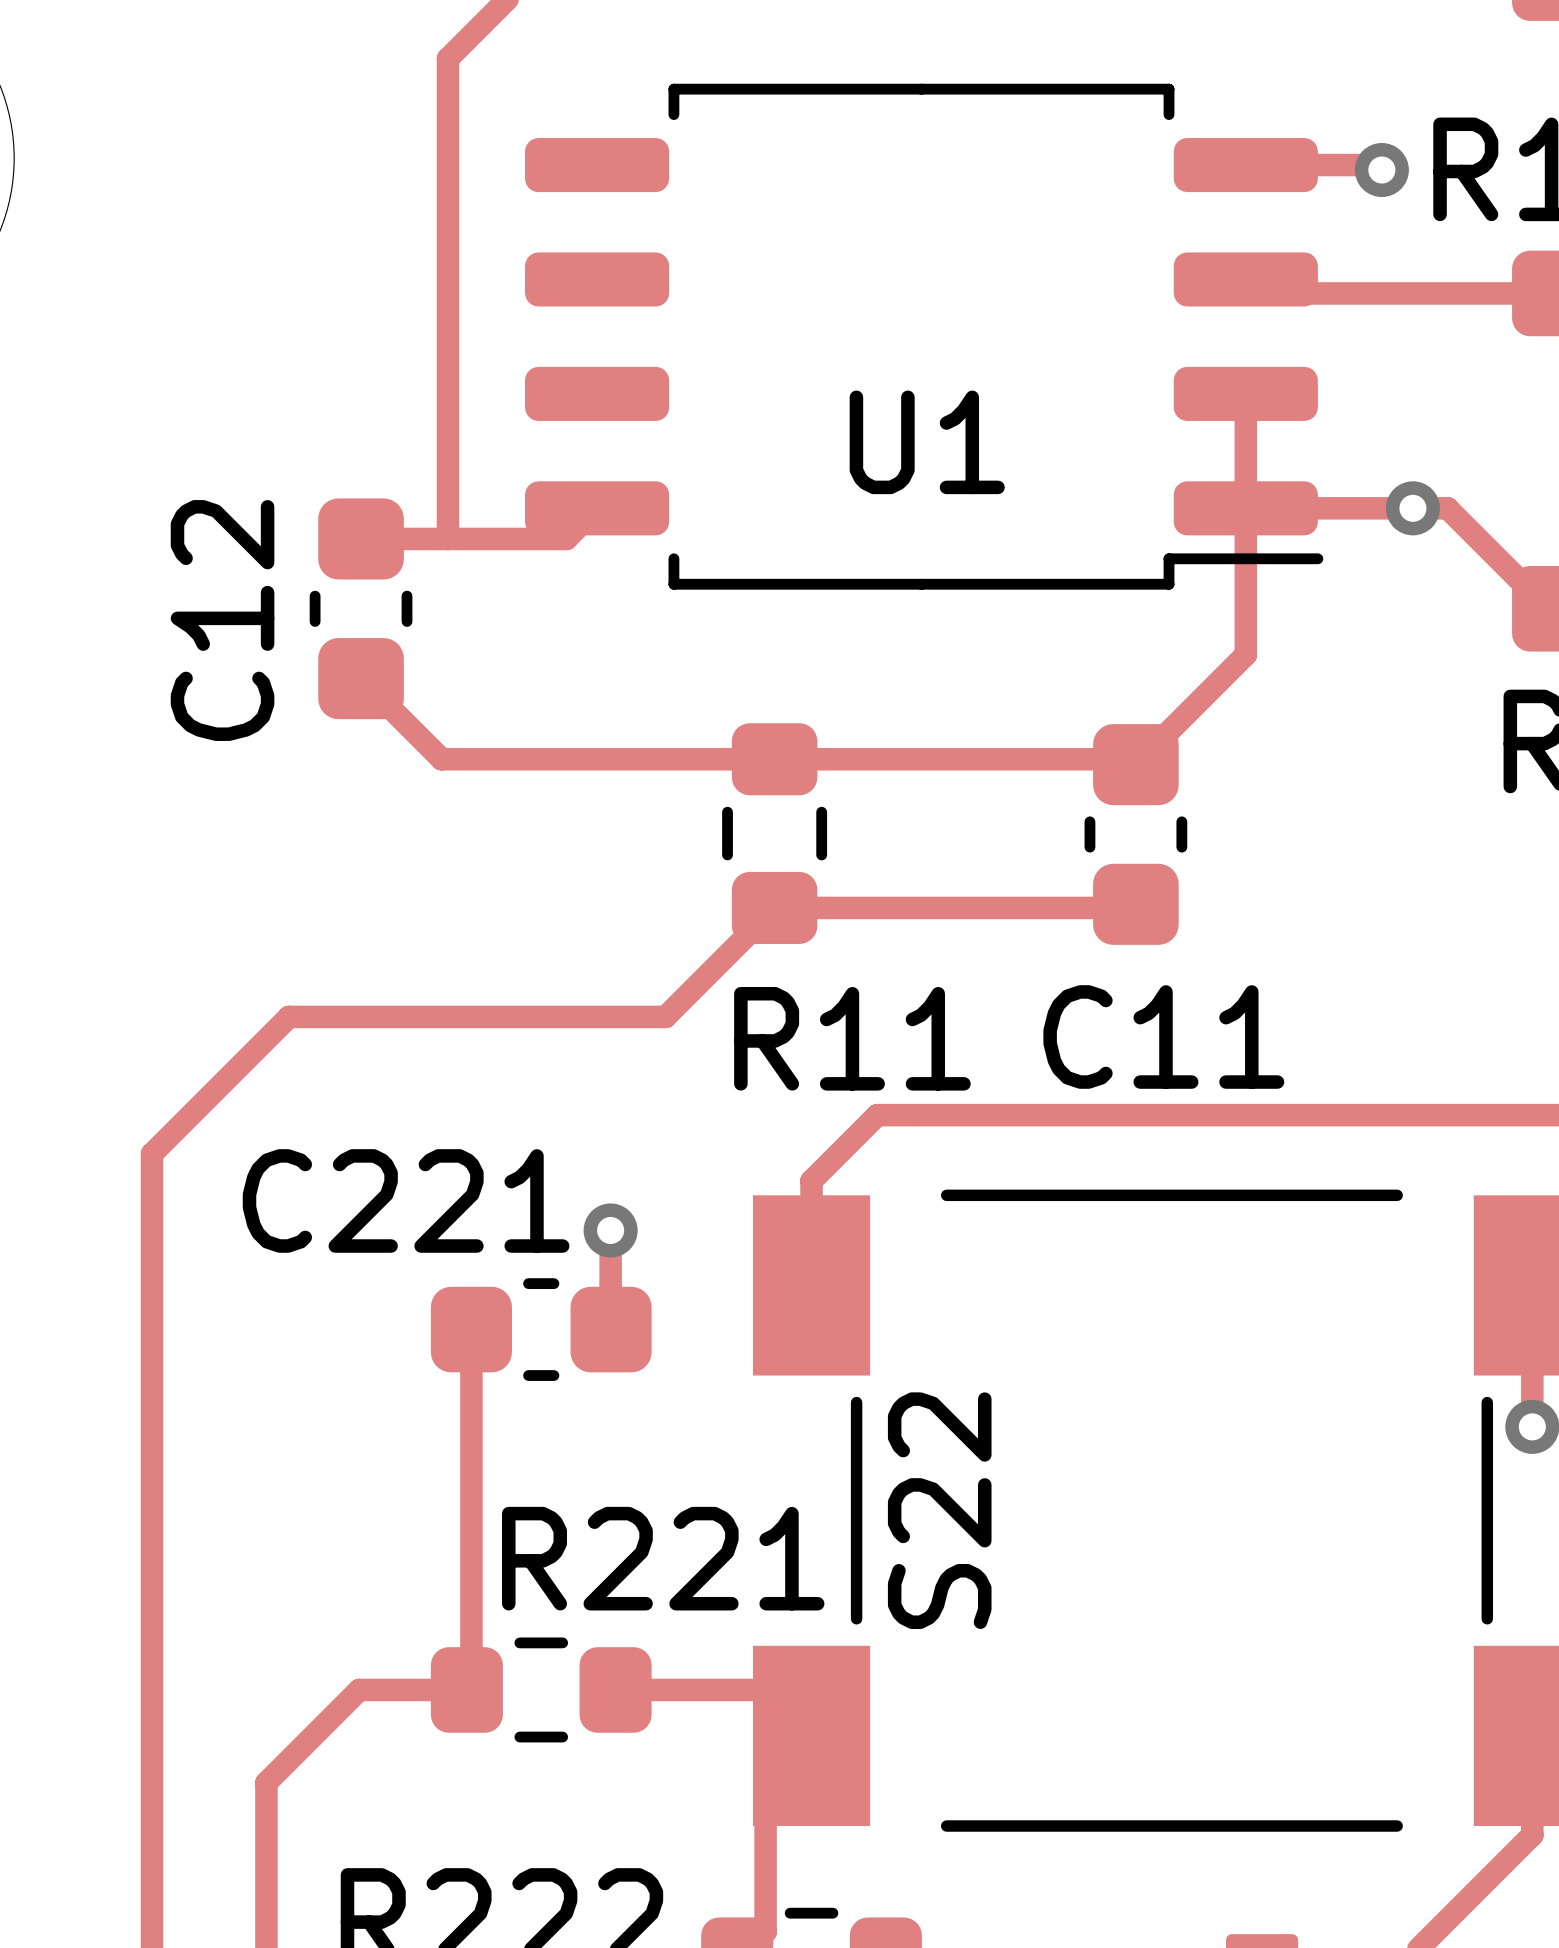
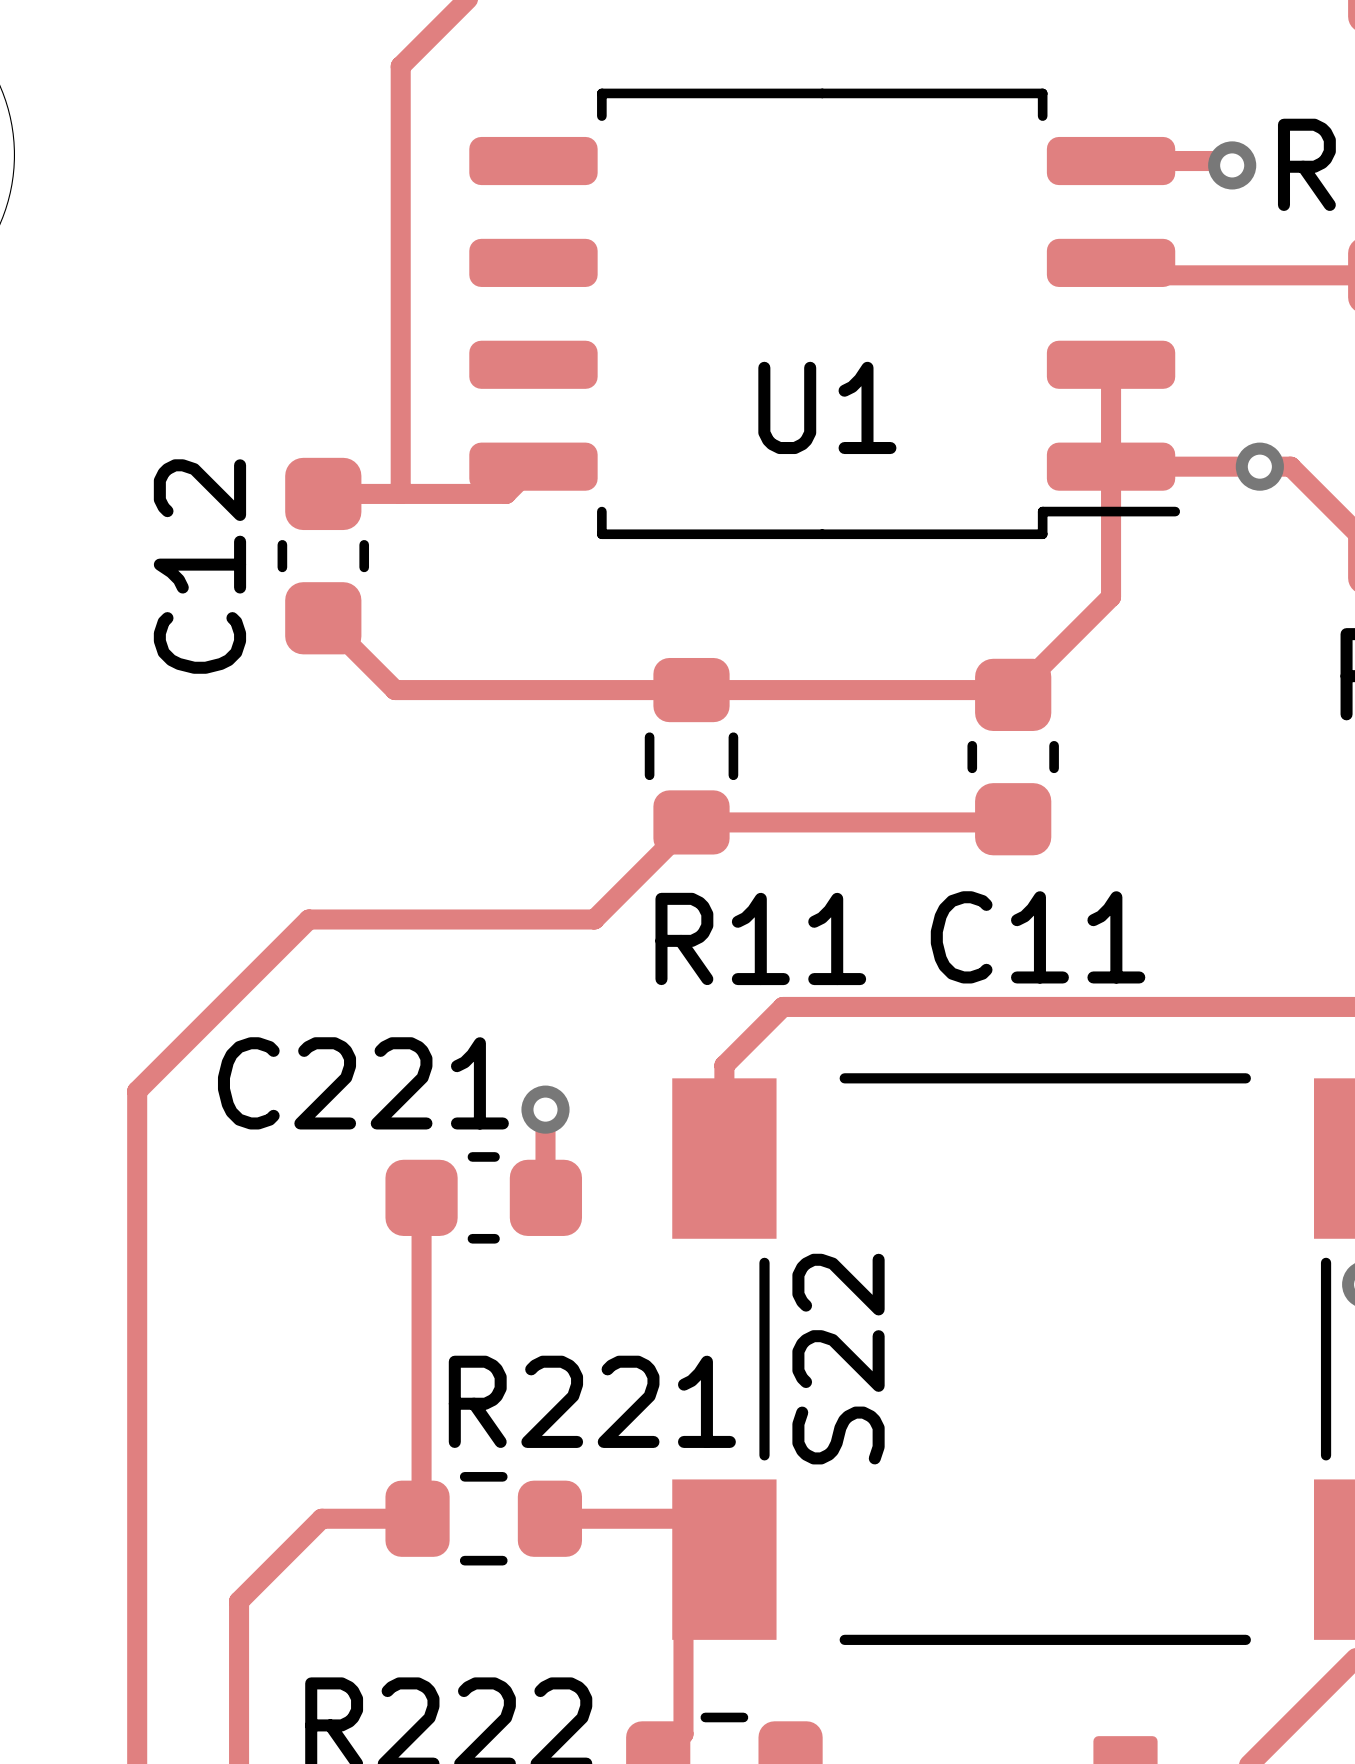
track: (344, 1016) (288, 1016) (152, 1153) (152, 1209) -> (308, 919) (137, 1091)

